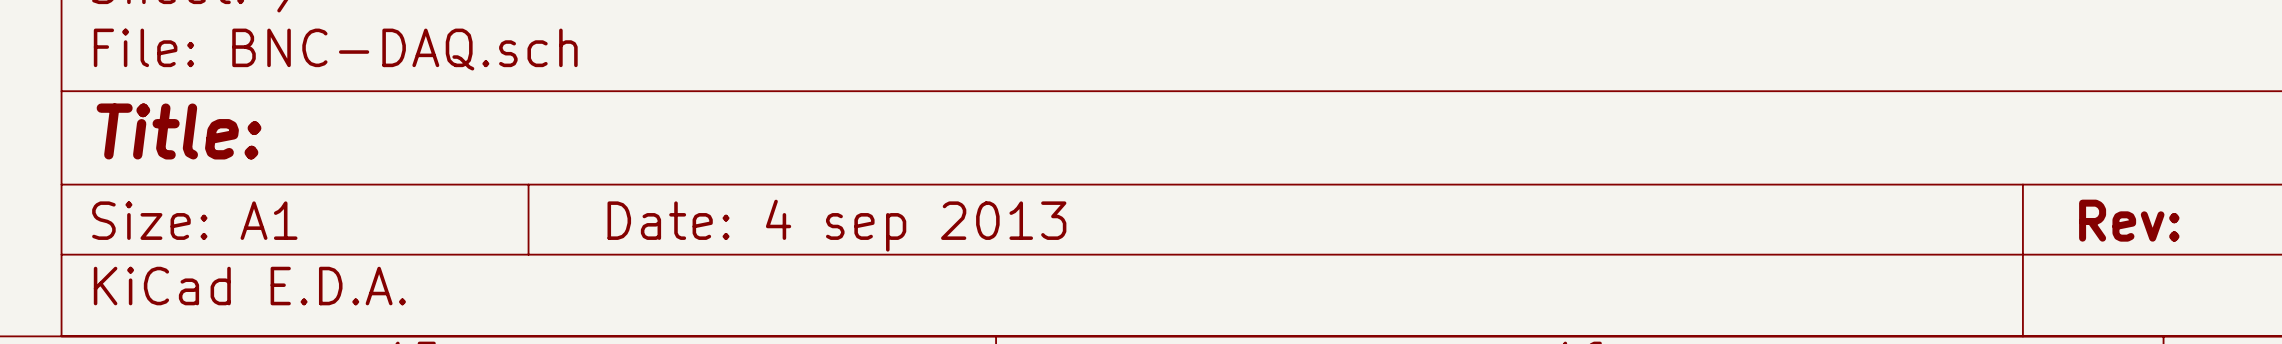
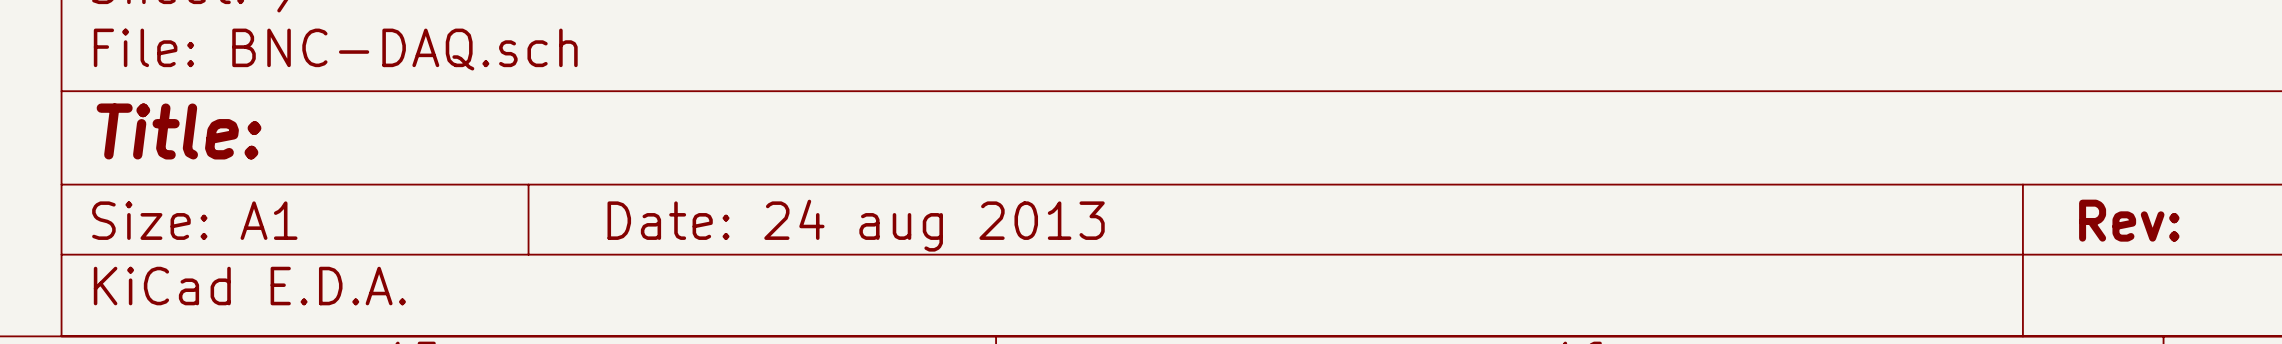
title block: Date: 4 sep 2013 (836, 225) -> Date: 24 aug 2013 (856, 225)

